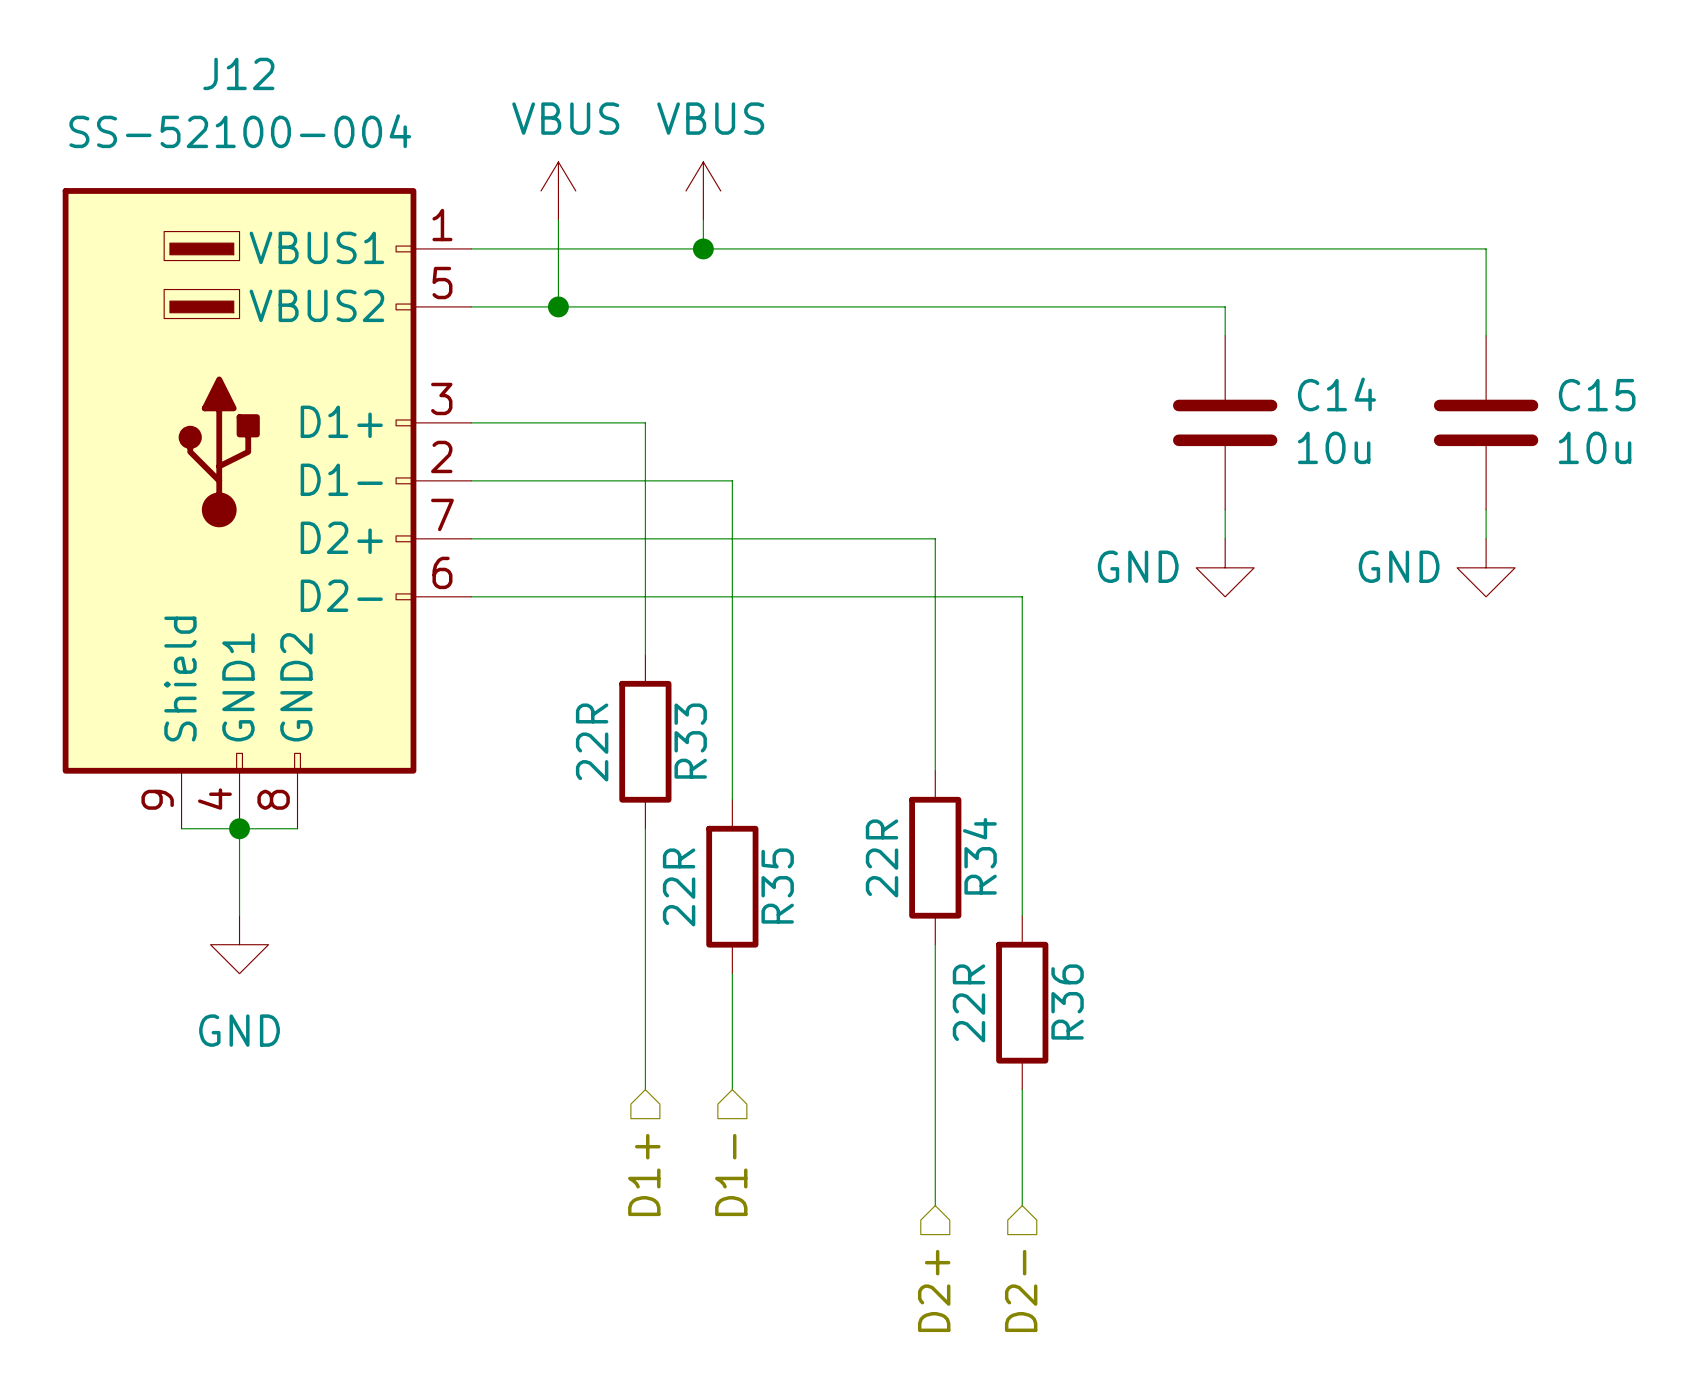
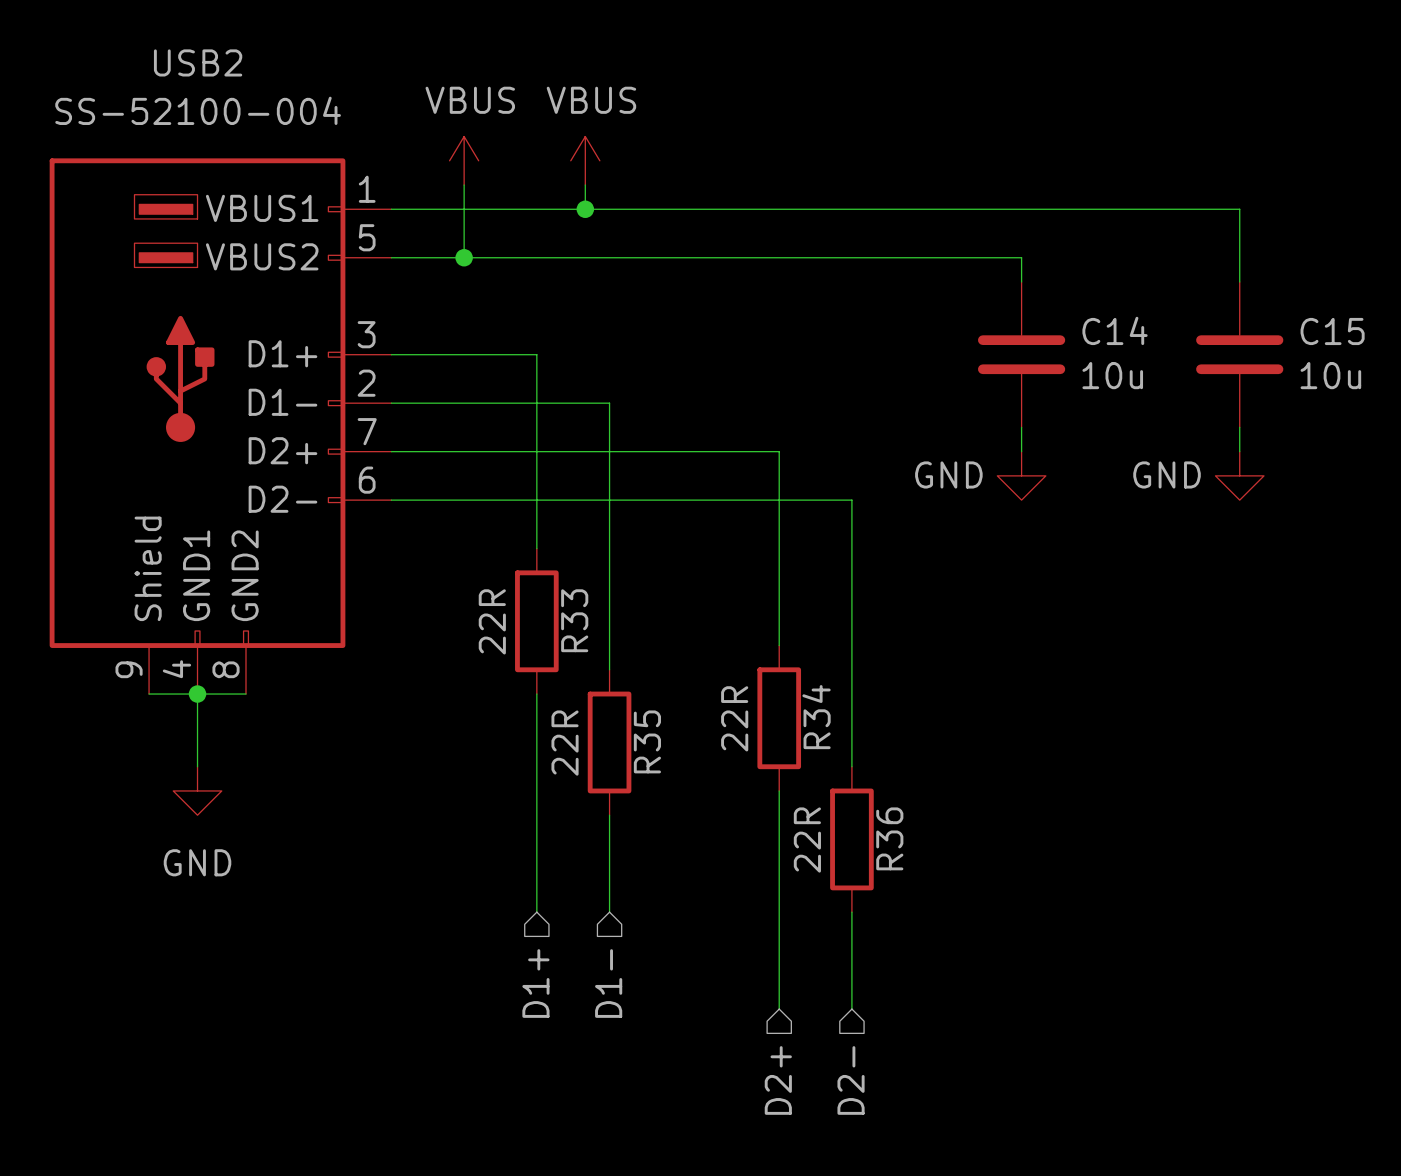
J12 name: J12 (238, 73) -> USB2 (198, 62)

